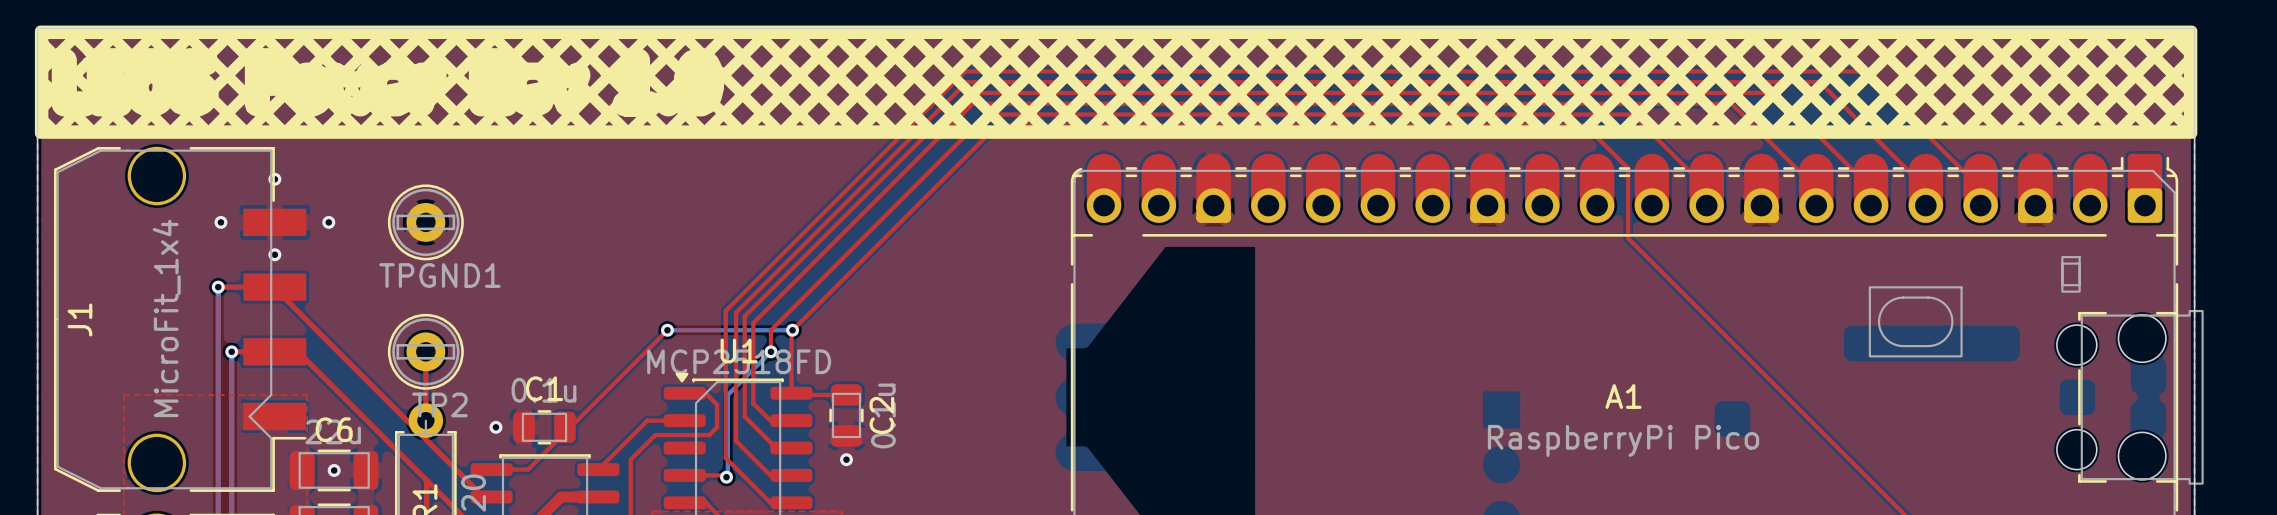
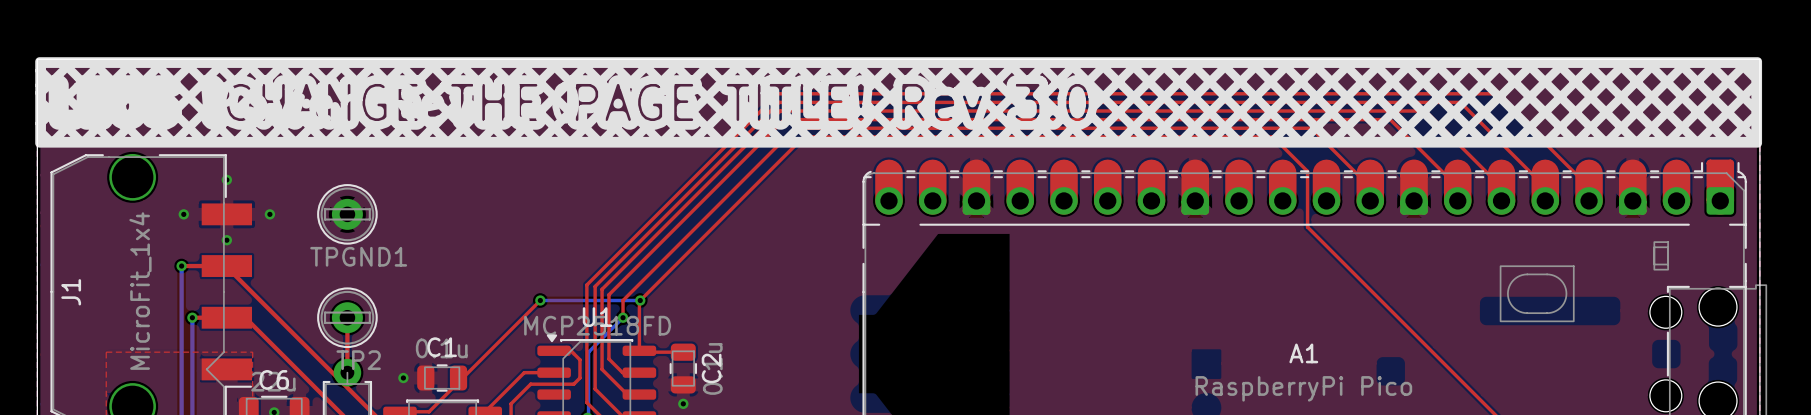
drawing shape: [34, 25, 2198, 139] -> [35, 57, 1763, 148]
drawing: [259, 62, 320, 103] -> none
drawing: [482, 62, 505, 82] -> none
drawing: [688, 62, 710, 103] -> none
drawing: none -> [578, 86, 623, 109]
drawing: none -> [904, 86, 922, 103]
drawing: none -> [1068, 86, 1087, 119]
drawing: none -> [301, 98, 312, 109]

